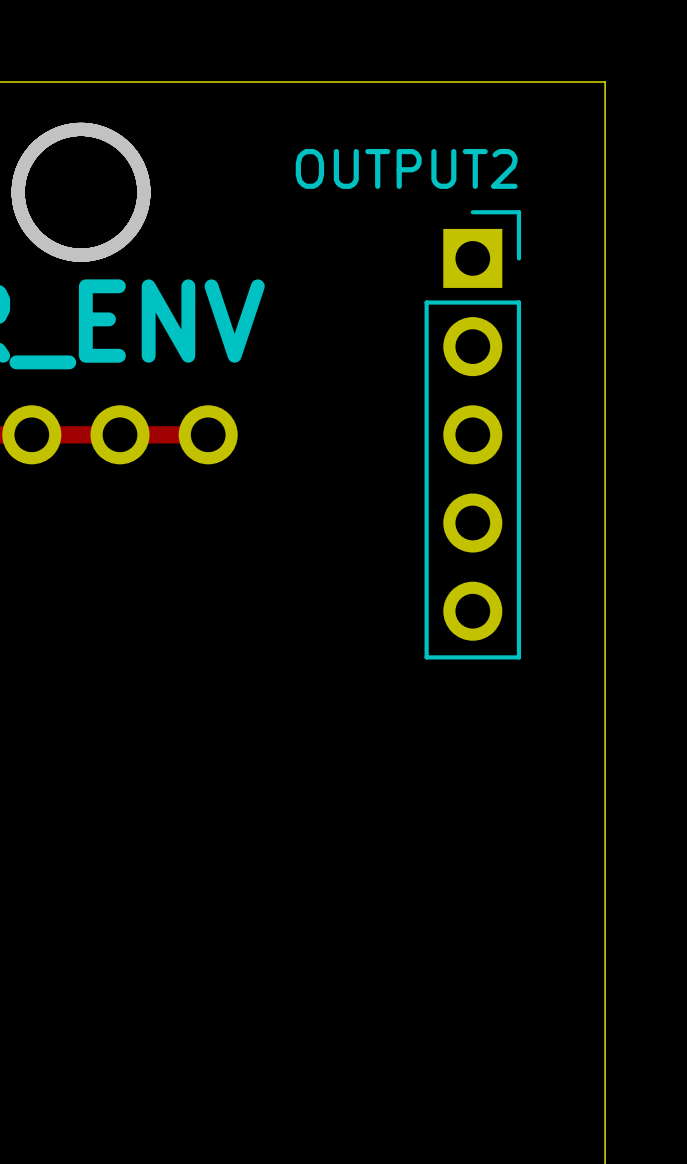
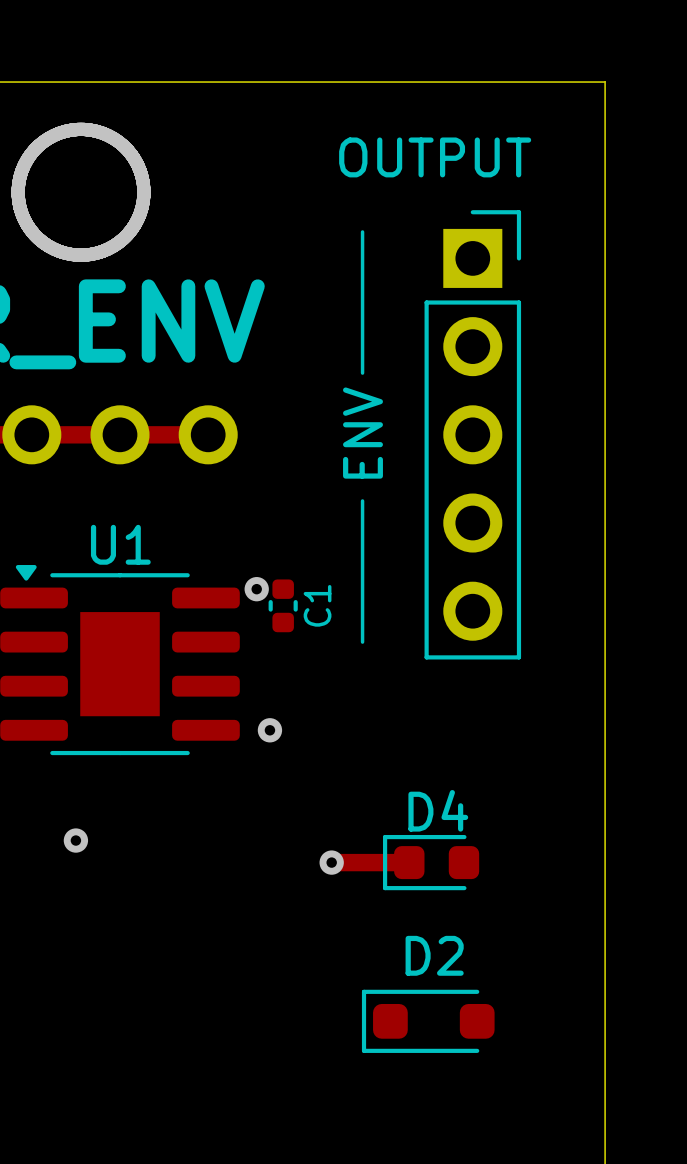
text: none -> OUTPUT (435, 157)
OUTPUT2 name: OUTPUT2 (406, 168) -> none
line: none -> (362, 231) (362, 373)
text: none -> ENV (362, 433)
line: none -> (362, 500) (362, 642)
via: none -> (256, 589)
C1: none -> (283, 605)
U1: none -> (120, 660)
via: none -> (269, 730)
via: none -> (75, 840)
top track: none -> (331, 862) (409, 862)
via: none -> (331, 862)
D4: none -> (431, 862)
D2: none -> (428, 1021)

